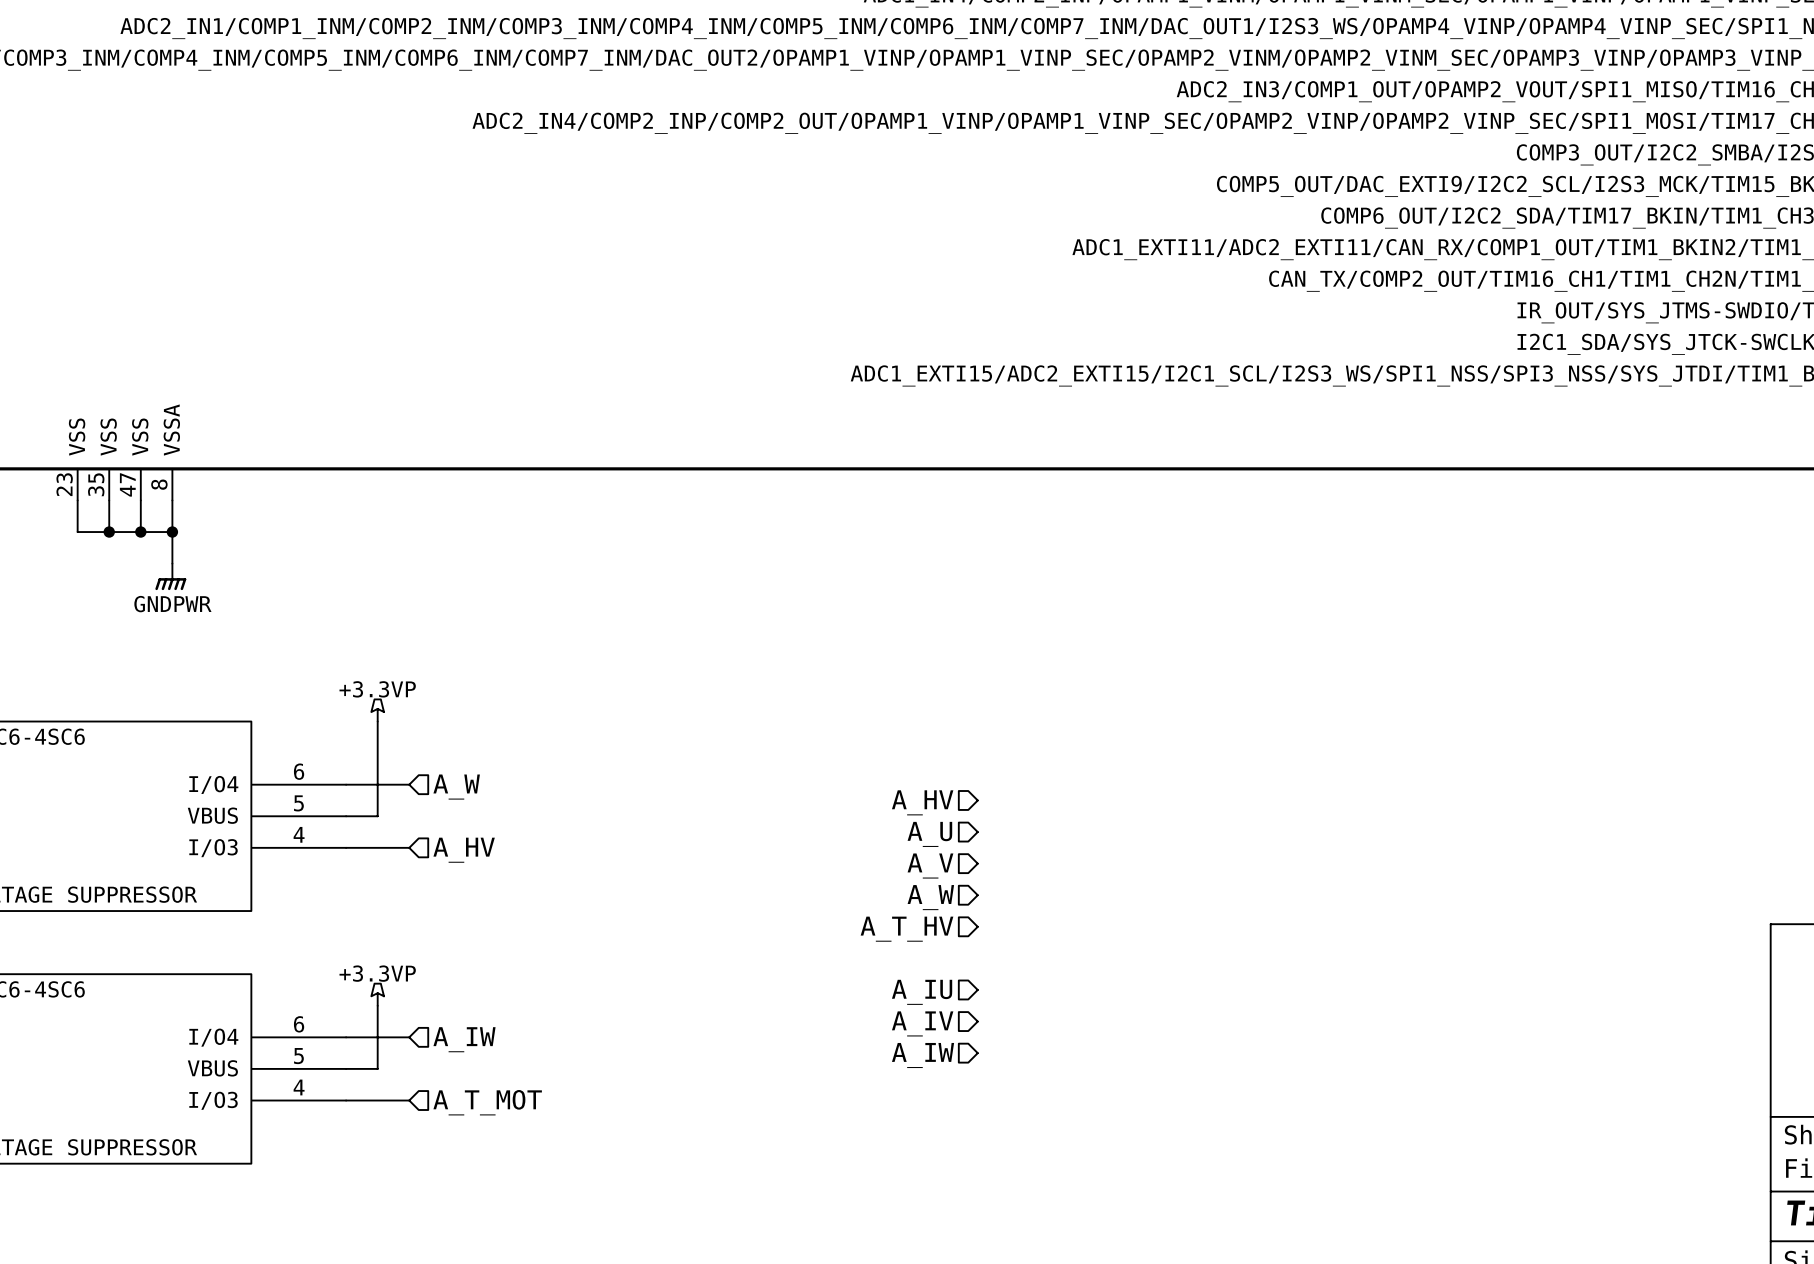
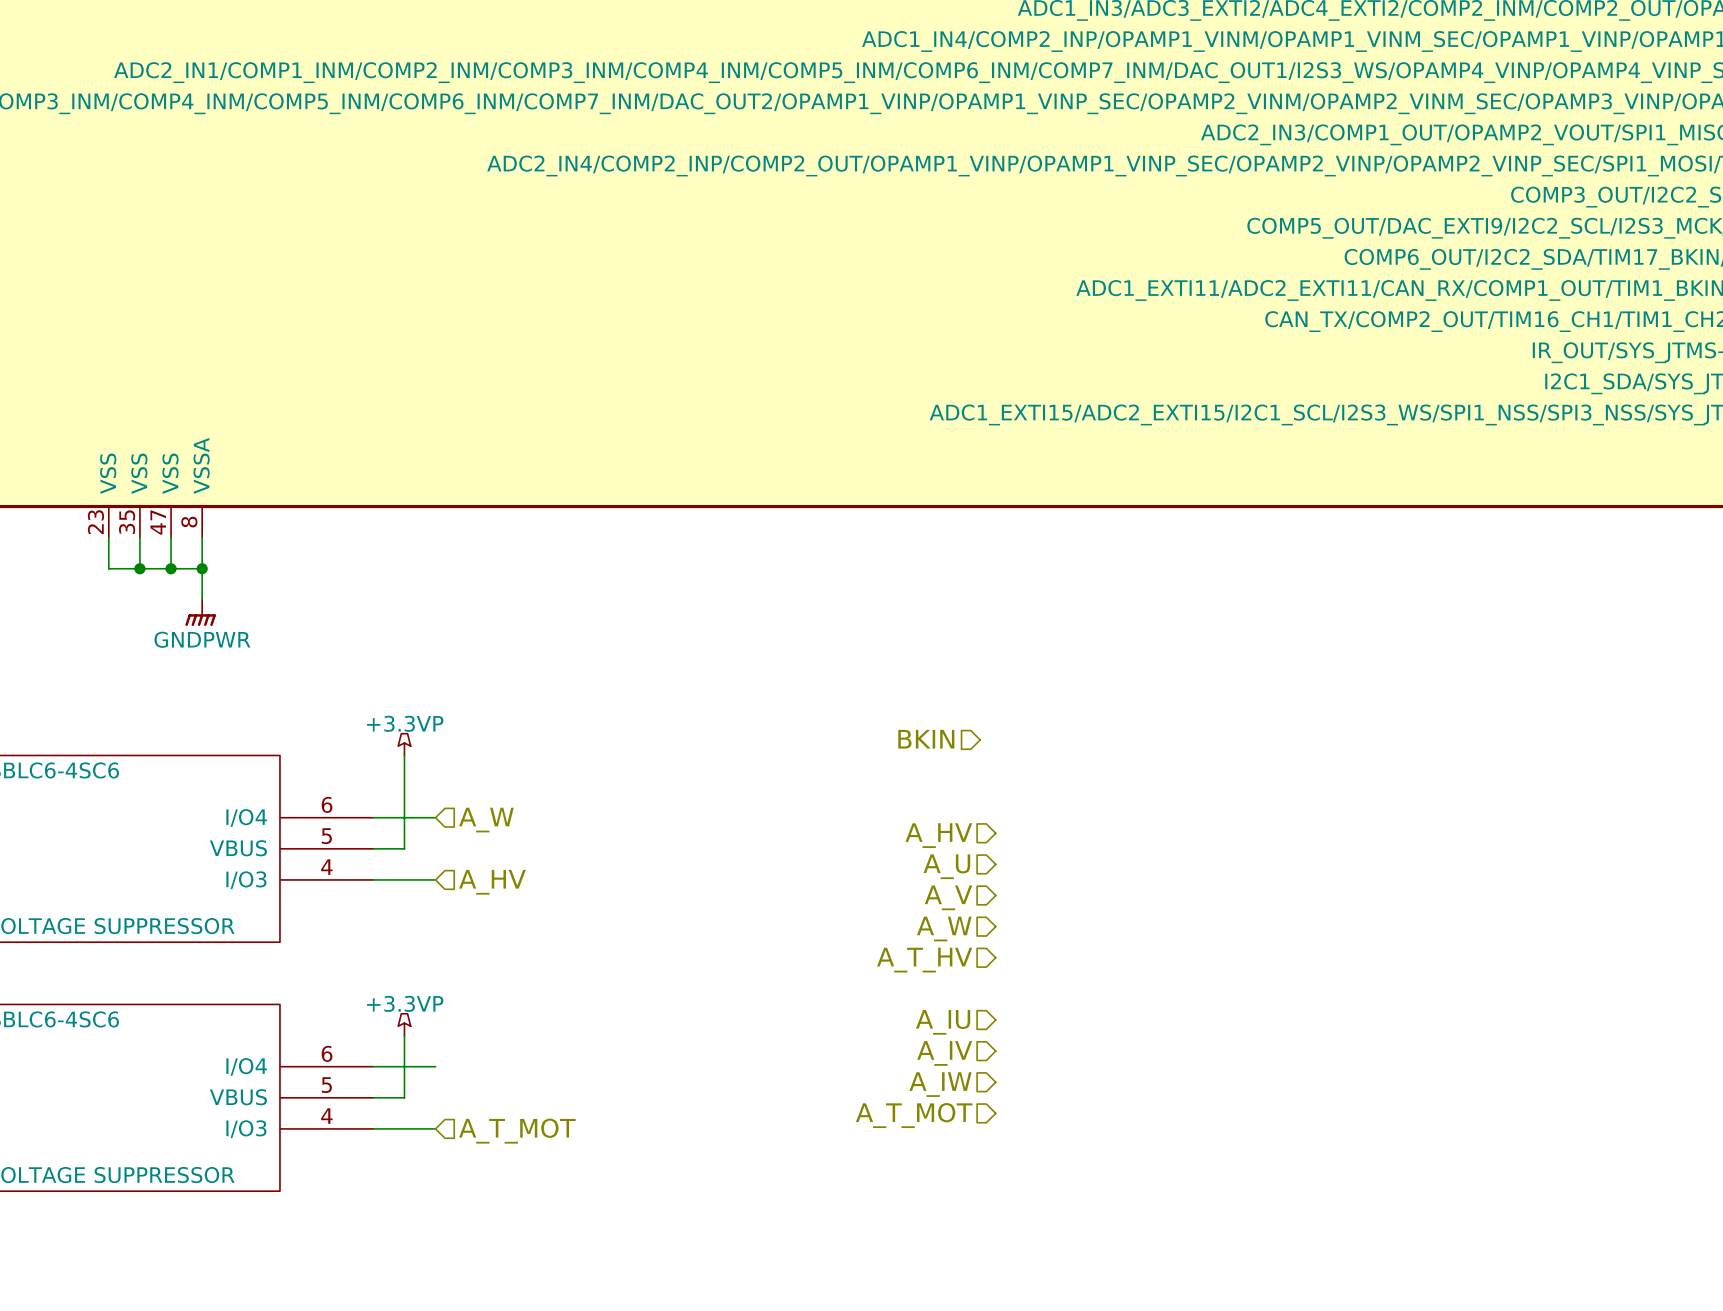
hierarchical label: none -> BKIN (926, 739)
hierarchical label: A_IW (464, 1039) -> none
hierarchical label: none -> A_T_MOT (914, 1115)

